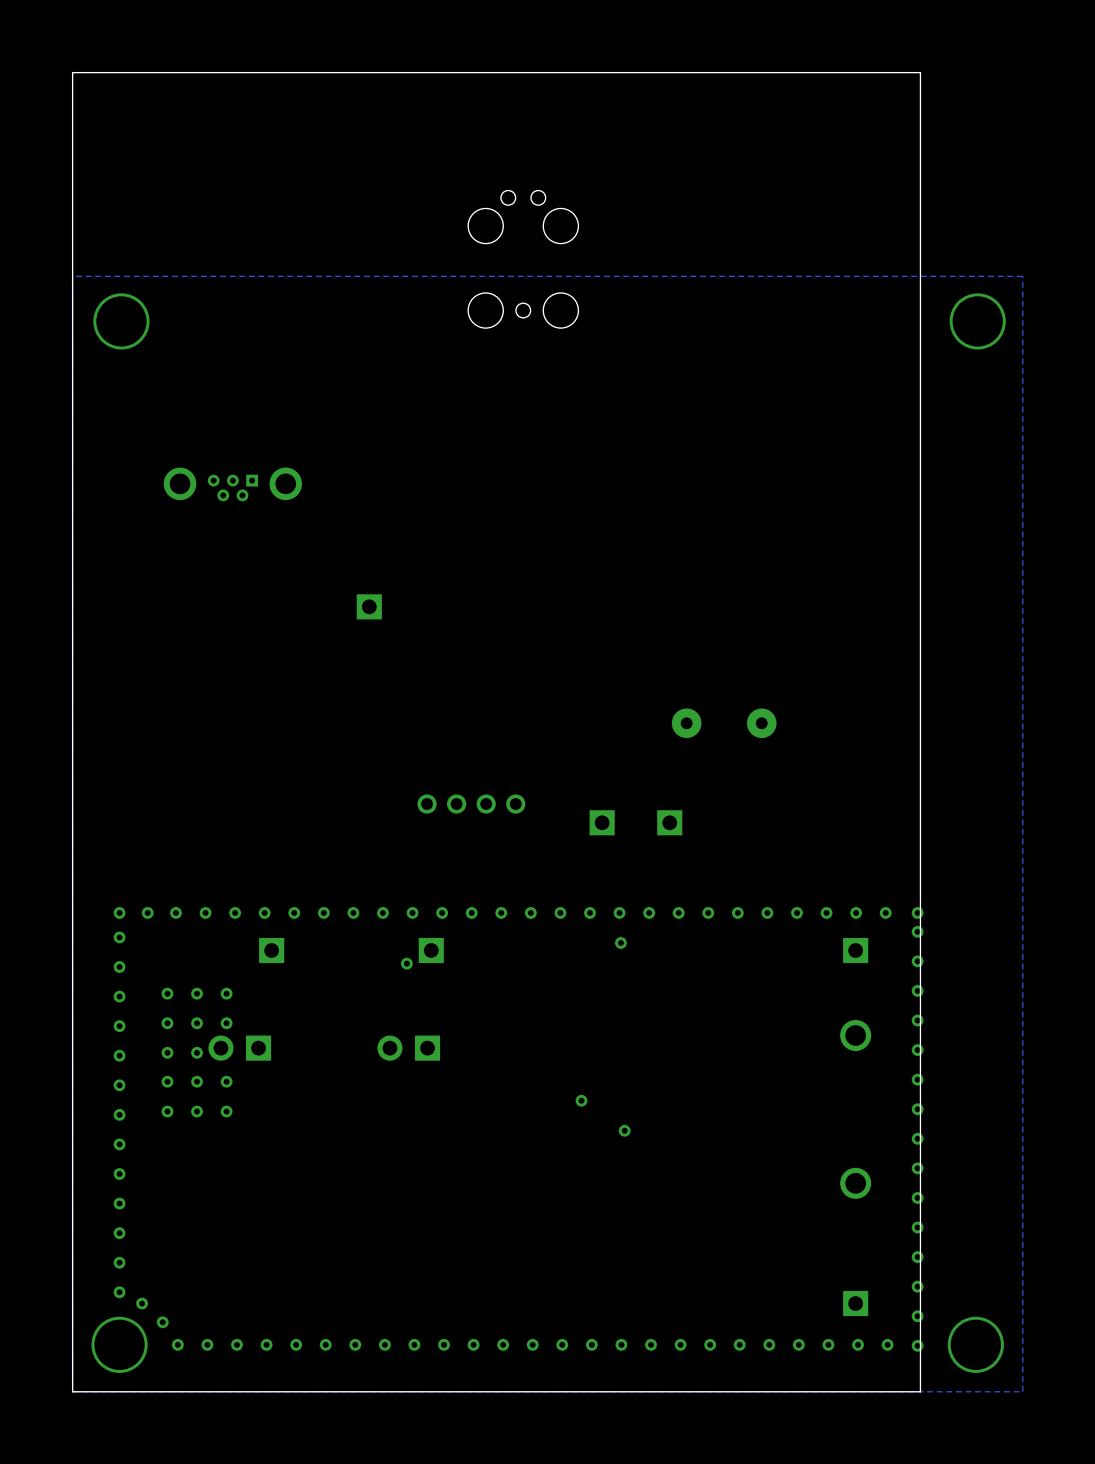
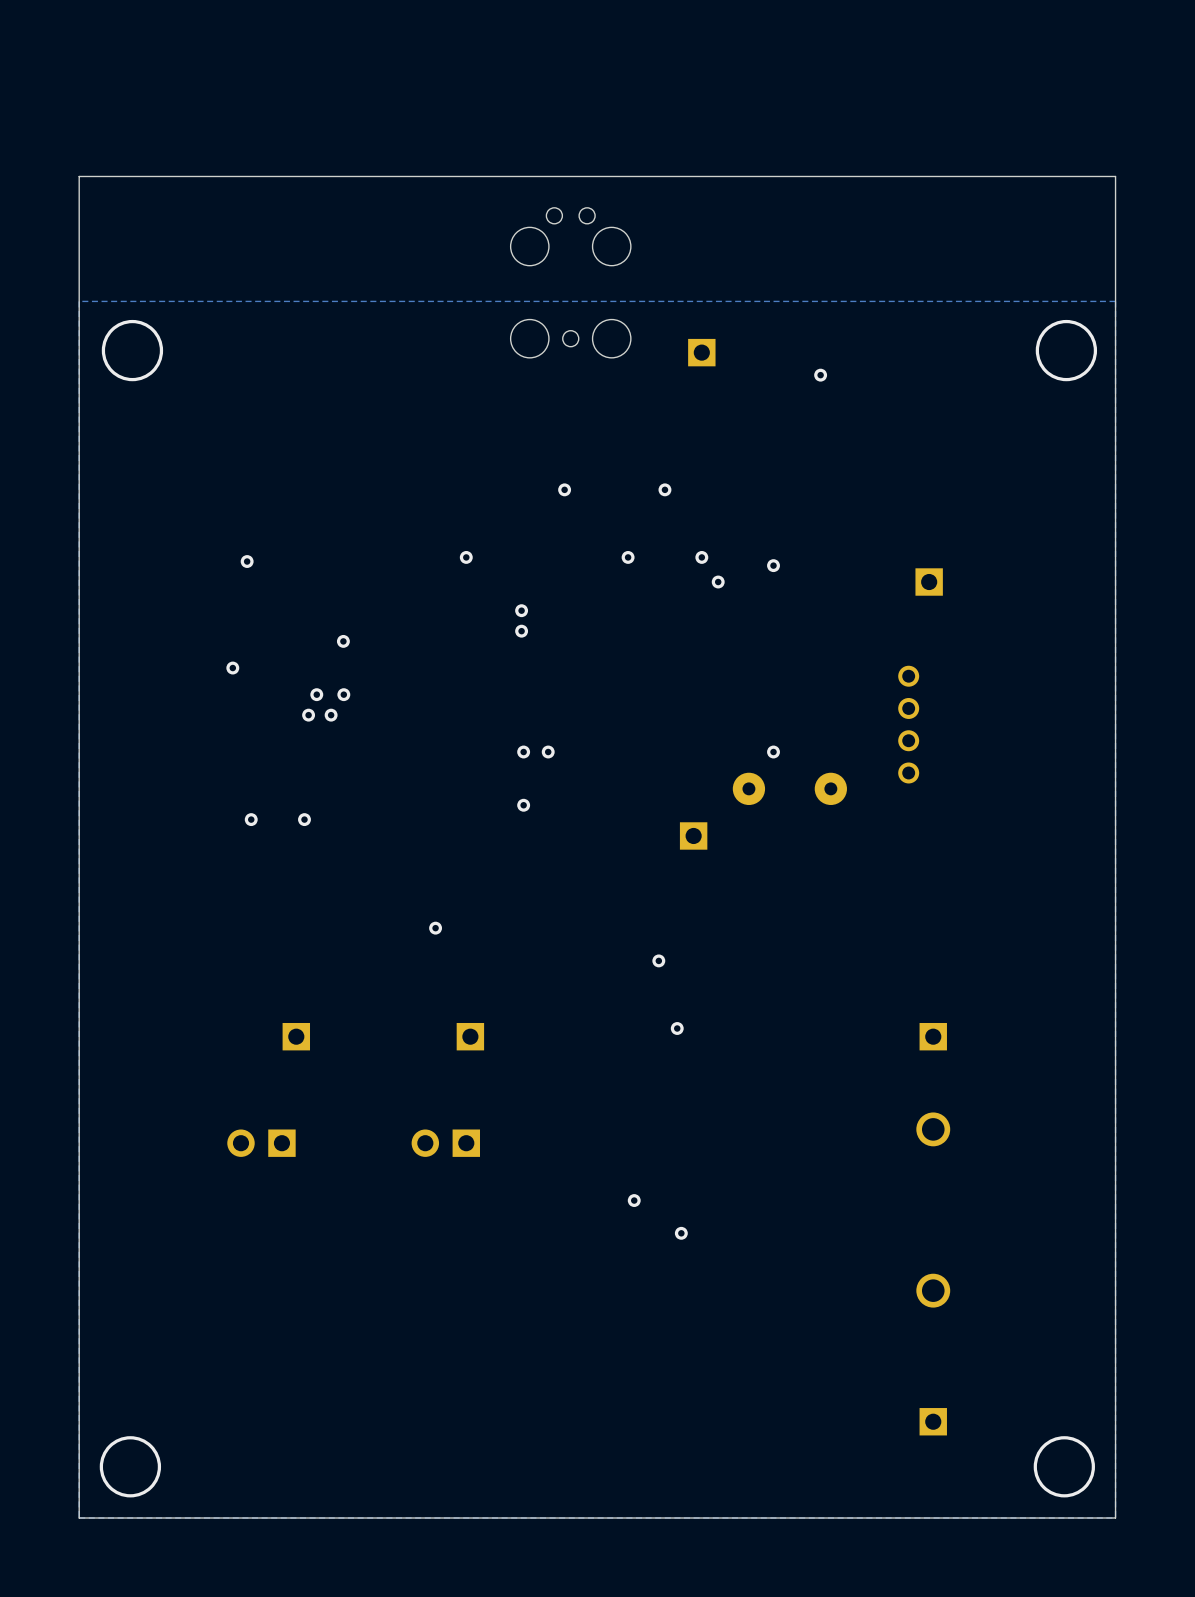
board edge: (72, 161) (72, 72) (920, 72) (920, 1391) -> (79, 176) (1115, 176) (1115, 1518) (1003, 1518)
part: none -> (701, 352)
via: none -> (820, 375)
via: none -> (564, 489)
via: none -> (664, 489)
part: (232, 484) -> none
via: none -> (466, 557)
via: none -> (628, 557)
via: none -> (701, 557)
via: none -> (247, 561)
via: none -> (773, 565)
via: none -> (718, 582)
part: none -> (929, 582)
via: none -> (521, 610)
via: none -> (521, 631)
via: none -> (343, 641)
part: (369, 606) -> none
via: none -> (232, 668)
via: none -> (316, 694)
via: none -> (343, 694)
via: none -> (308, 715)
via: none -> (331, 715)
part: none -> (908, 724)
via: none -> (523, 752)
via: none -> (548, 752)
via: none -> (773, 752)
via: none -> (523, 805)
via: none -> (251, 819)
via: none -> (304, 819)
part: none -> (693, 835)
part: (471, 804) -> none
part: (602, 822) -> none
part: (669, 822) -> none
via: none -> (435, 928)
via: none -> (658, 960)
via: (119, 912) -> none
via: (147, 912) -> none
via: (175, 912) -> none
via: (205, 912) -> none
via: (235, 912) -> none
via: (264, 912) -> none
via: (294, 912) -> none
via: (323, 912) -> none
via: (353, 912) -> none
via: (382, 912) -> none
via: (412, 912) -> none
via: (442, 912) -> none
via: (471, 912) -> none
via: (501, 912) -> none
via: (530, 912) -> none
via: (560, 912) -> none
via: (589, 912) -> none
via: (619, 912) -> none
via: (649, 912) -> none
via: (678, 912) -> none
via: (708, 912) -> none
via: (737, 912) -> none
via: (767, 912) -> none
via: (796, 912) -> none
via: (826, 912) -> none
via: (856, 912) -> none
via: (885, 912) -> none
via: (917, 912) -> none
via: (917, 931) -> none
via: (119, 937) -> none
via: (917, 961) -> none
via: (406, 963) -> none
via: (119, 967) -> none
via: (917, 990) -> none
via: (167, 993) -> none
via: (197, 993) -> none
via: (226, 993) -> none
via: (119, 996) -> none
via: (917, 1020) -> none
via: (167, 1023) -> none
via: (197, 1023) -> none
via: (226, 1023) -> none
via: (119, 1026) -> none
via: (917, 1050) -> none
via: (167, 1052) -> none
via: (197, 1052) -> none
via: (119, 1055) -> none
via: (917, 1079) -> none
via: (167, 1081) -> none
via: (197, 1081) -> none
via: (226, 1081) -> none
via: (119, 1085) -> none
via: (917, 1109) -> none
via: (167, 1111) -> none
via: (197, 1111) -> none
via: (226, 1111) -> none
via: (119, 1114) -> none
via: (917, 1138) -> none
via: (119, 1144) -> none
via: (917, 1168) -> none
via: (119, 1174) -> none
via: (917, 1197) -> none
via: (119, 1203) -> none
via: (917, 1227) -> none
via: (119, 1233) -> none
via: (917, 1257) -> none
via: (119, 1262) -> none
via: (917, 1286) -> none
via: (119, 1292) -> none
via: (142, 1303) -> none
via: (917, 1316) -> none
via: (162, 1322) -> none
via: (177, 1344) -> none
via: (207, 1344) -> none
via: (237, 1344) -> none
via: (266, 1344) -> none
via: (296, 1344) -> none
via: (325, 1344) -> none
via: (355, 1344) -> none
via: (384, 1344) -> none
via: (414, 1344) -> none
via: (444, 1344) -> none
via: (473, 1344) -> none
via: (503, 1344) -> none
via: (532, 1344) -> none
via: (562, 1344) -> none
via: (591, 1344) -> none
via: (621, 1344) -> none
via: (651, 1344) -> none
via: (680, 1344) -> none
via: (710, 1344) -> none
via: (739, 1344) -> none
via: (769, 1344) -> none
via: (798, 1344) -> none
via: (828, 1344) -> none
via: (858, 1344) -> none
via: (887, 1344) -> none
via: (917, 1345) -> none

